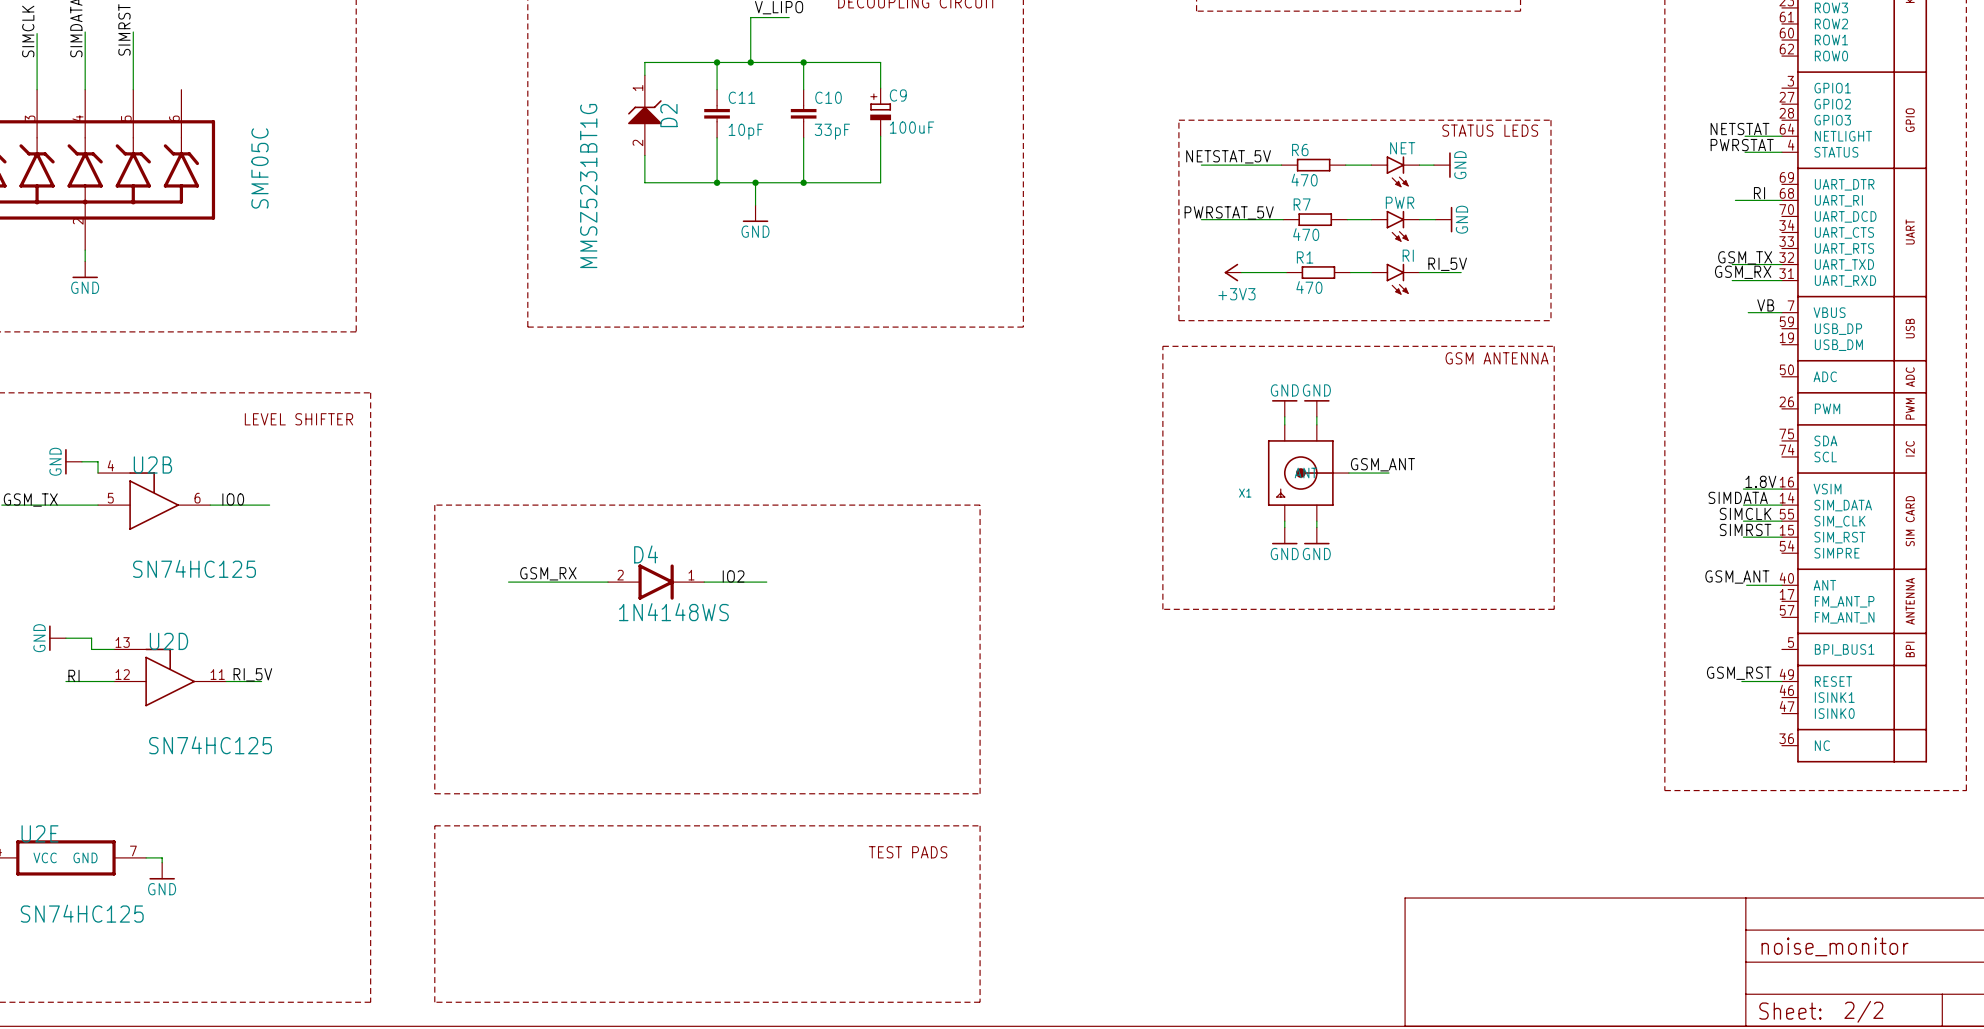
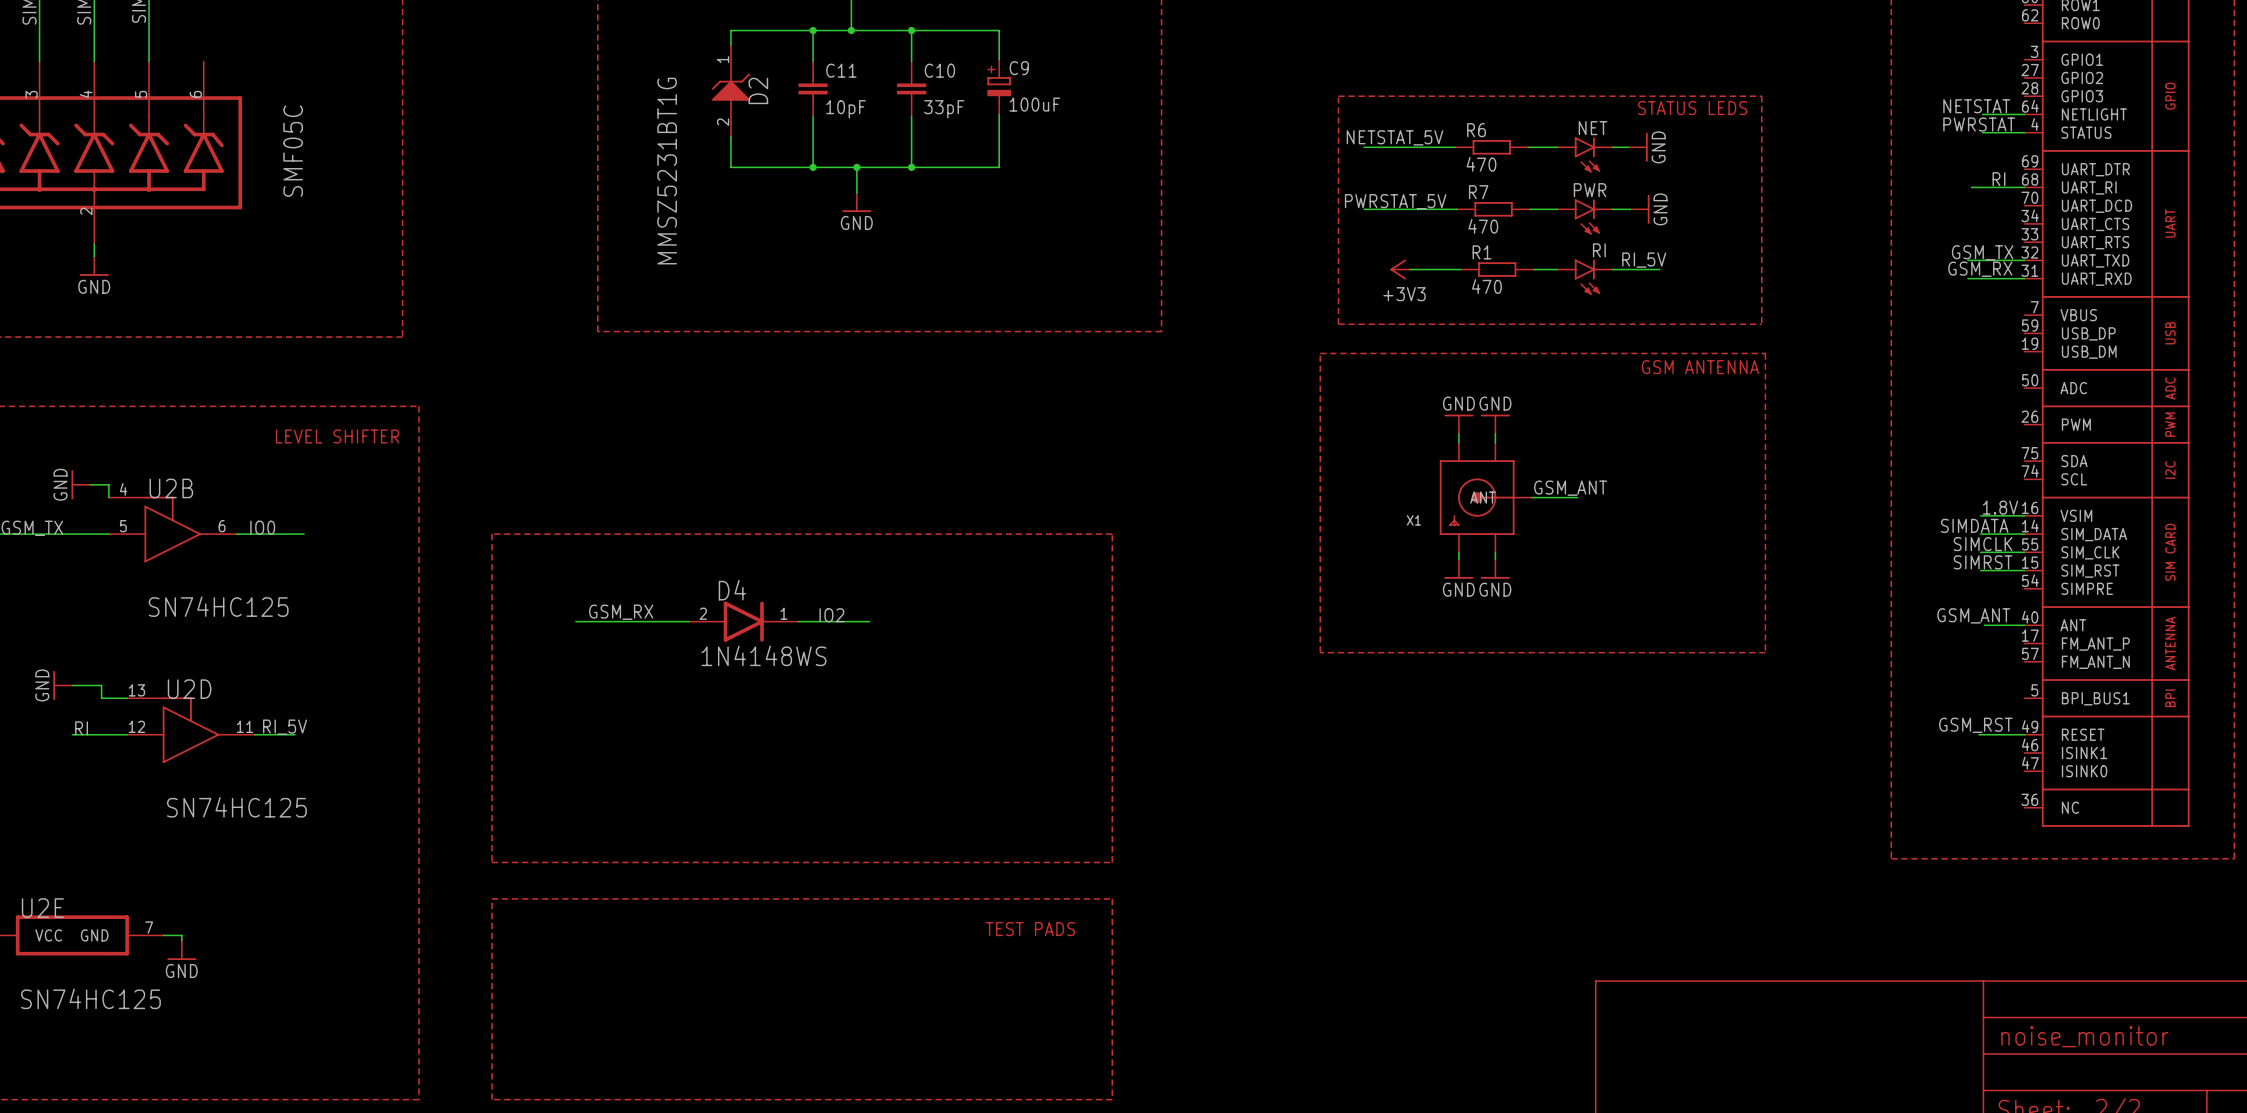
label: VB (1765, 305) -> none
wire: (1748, 312) (1781, 312) -> none

